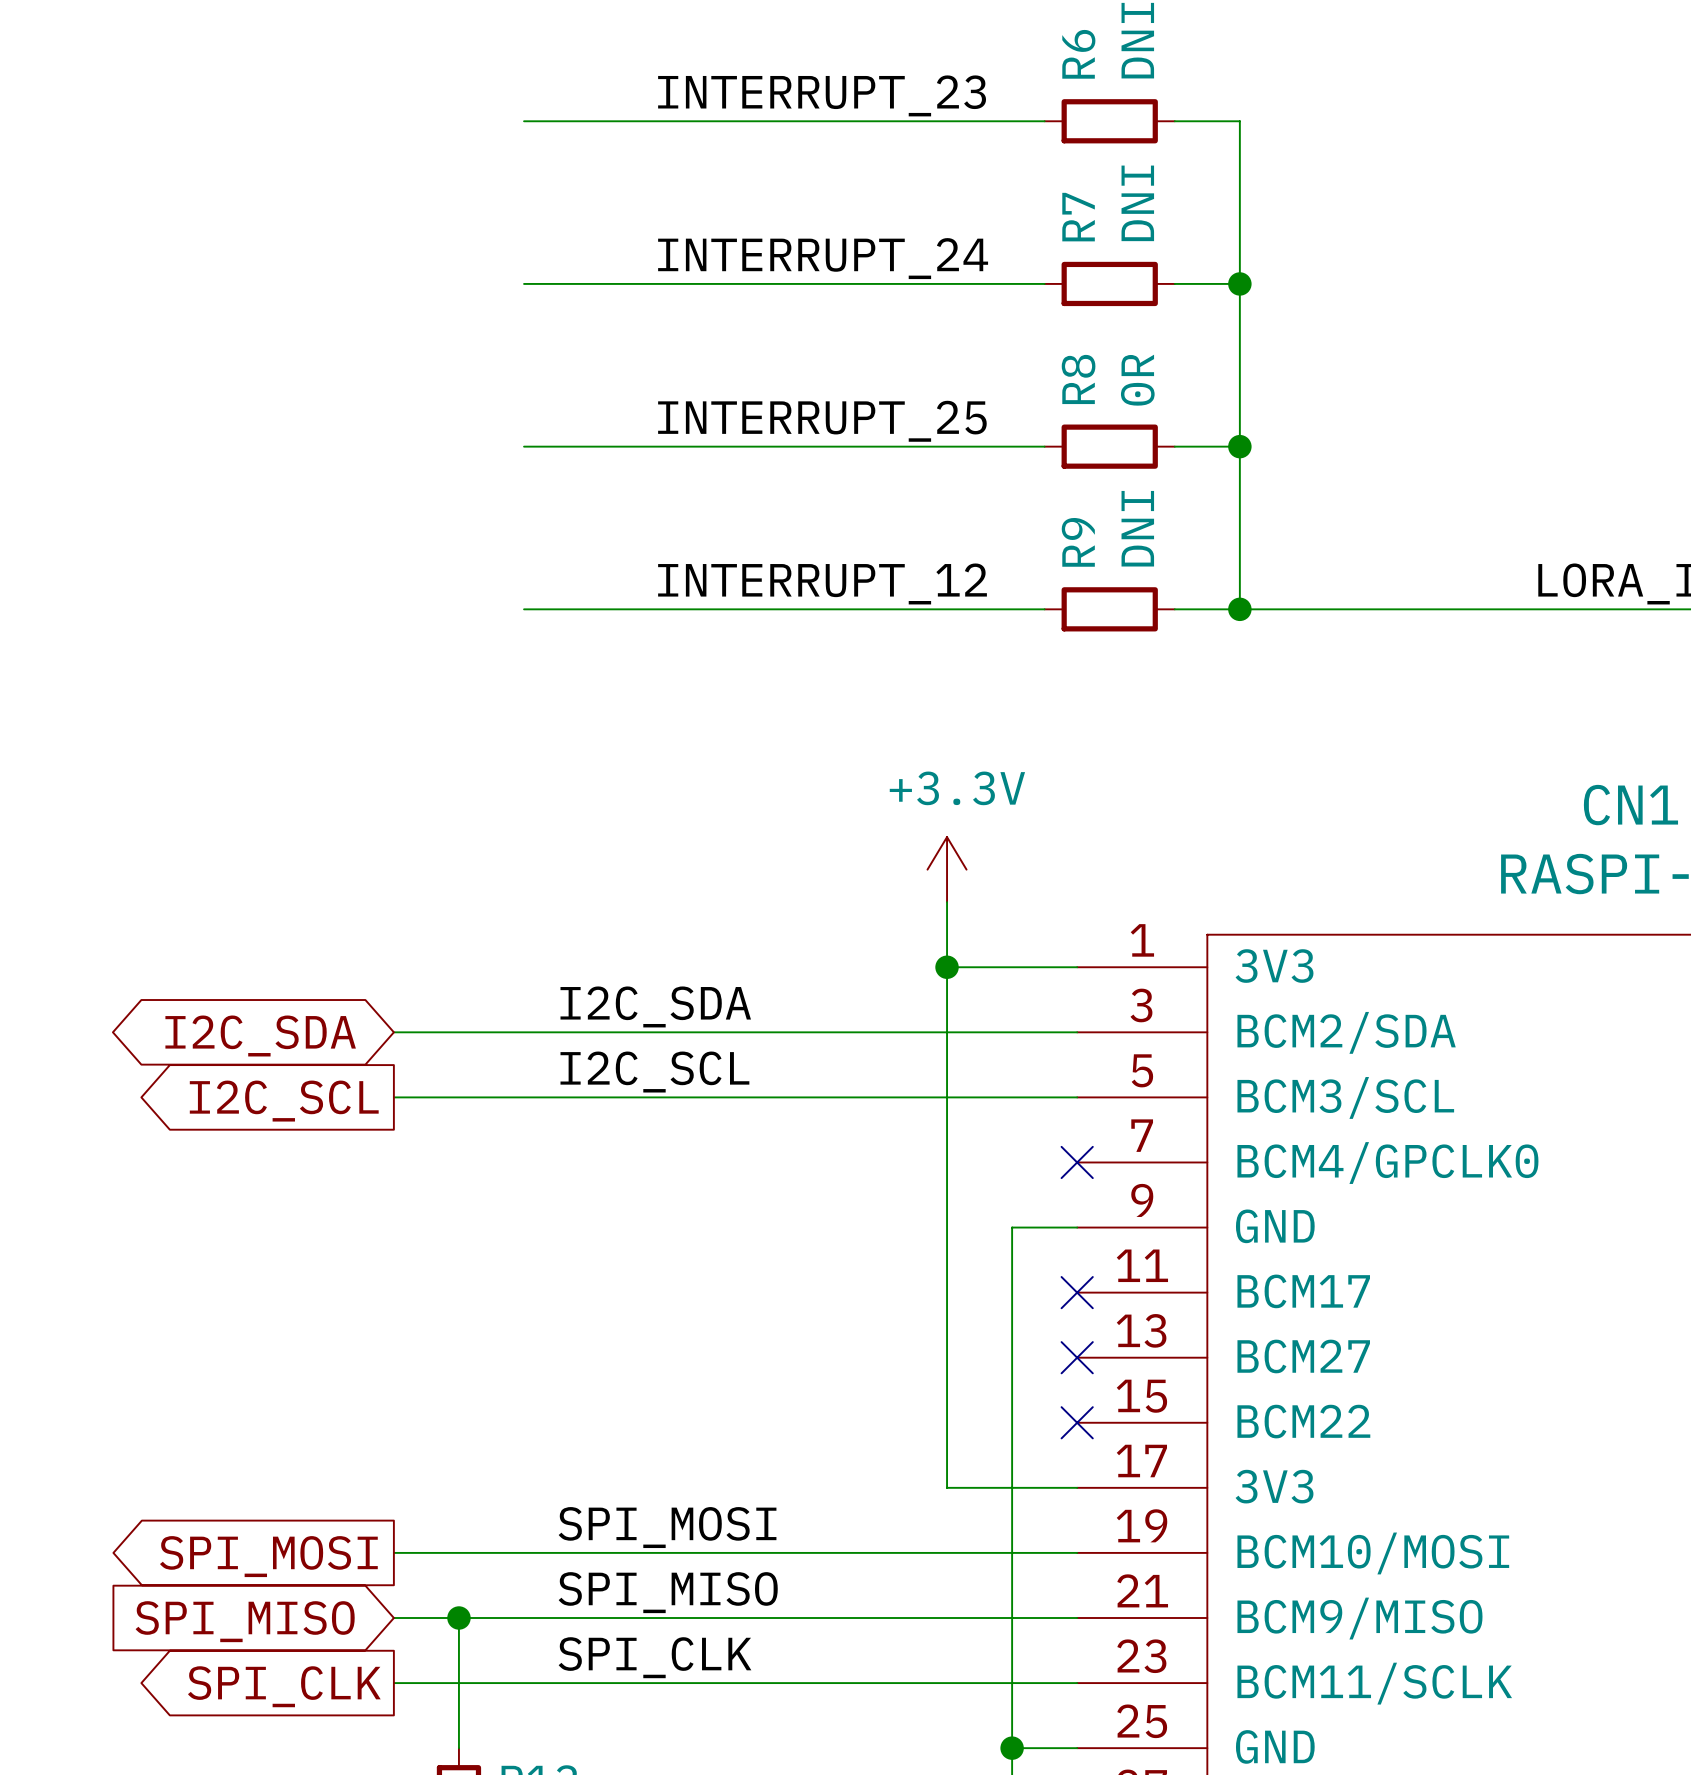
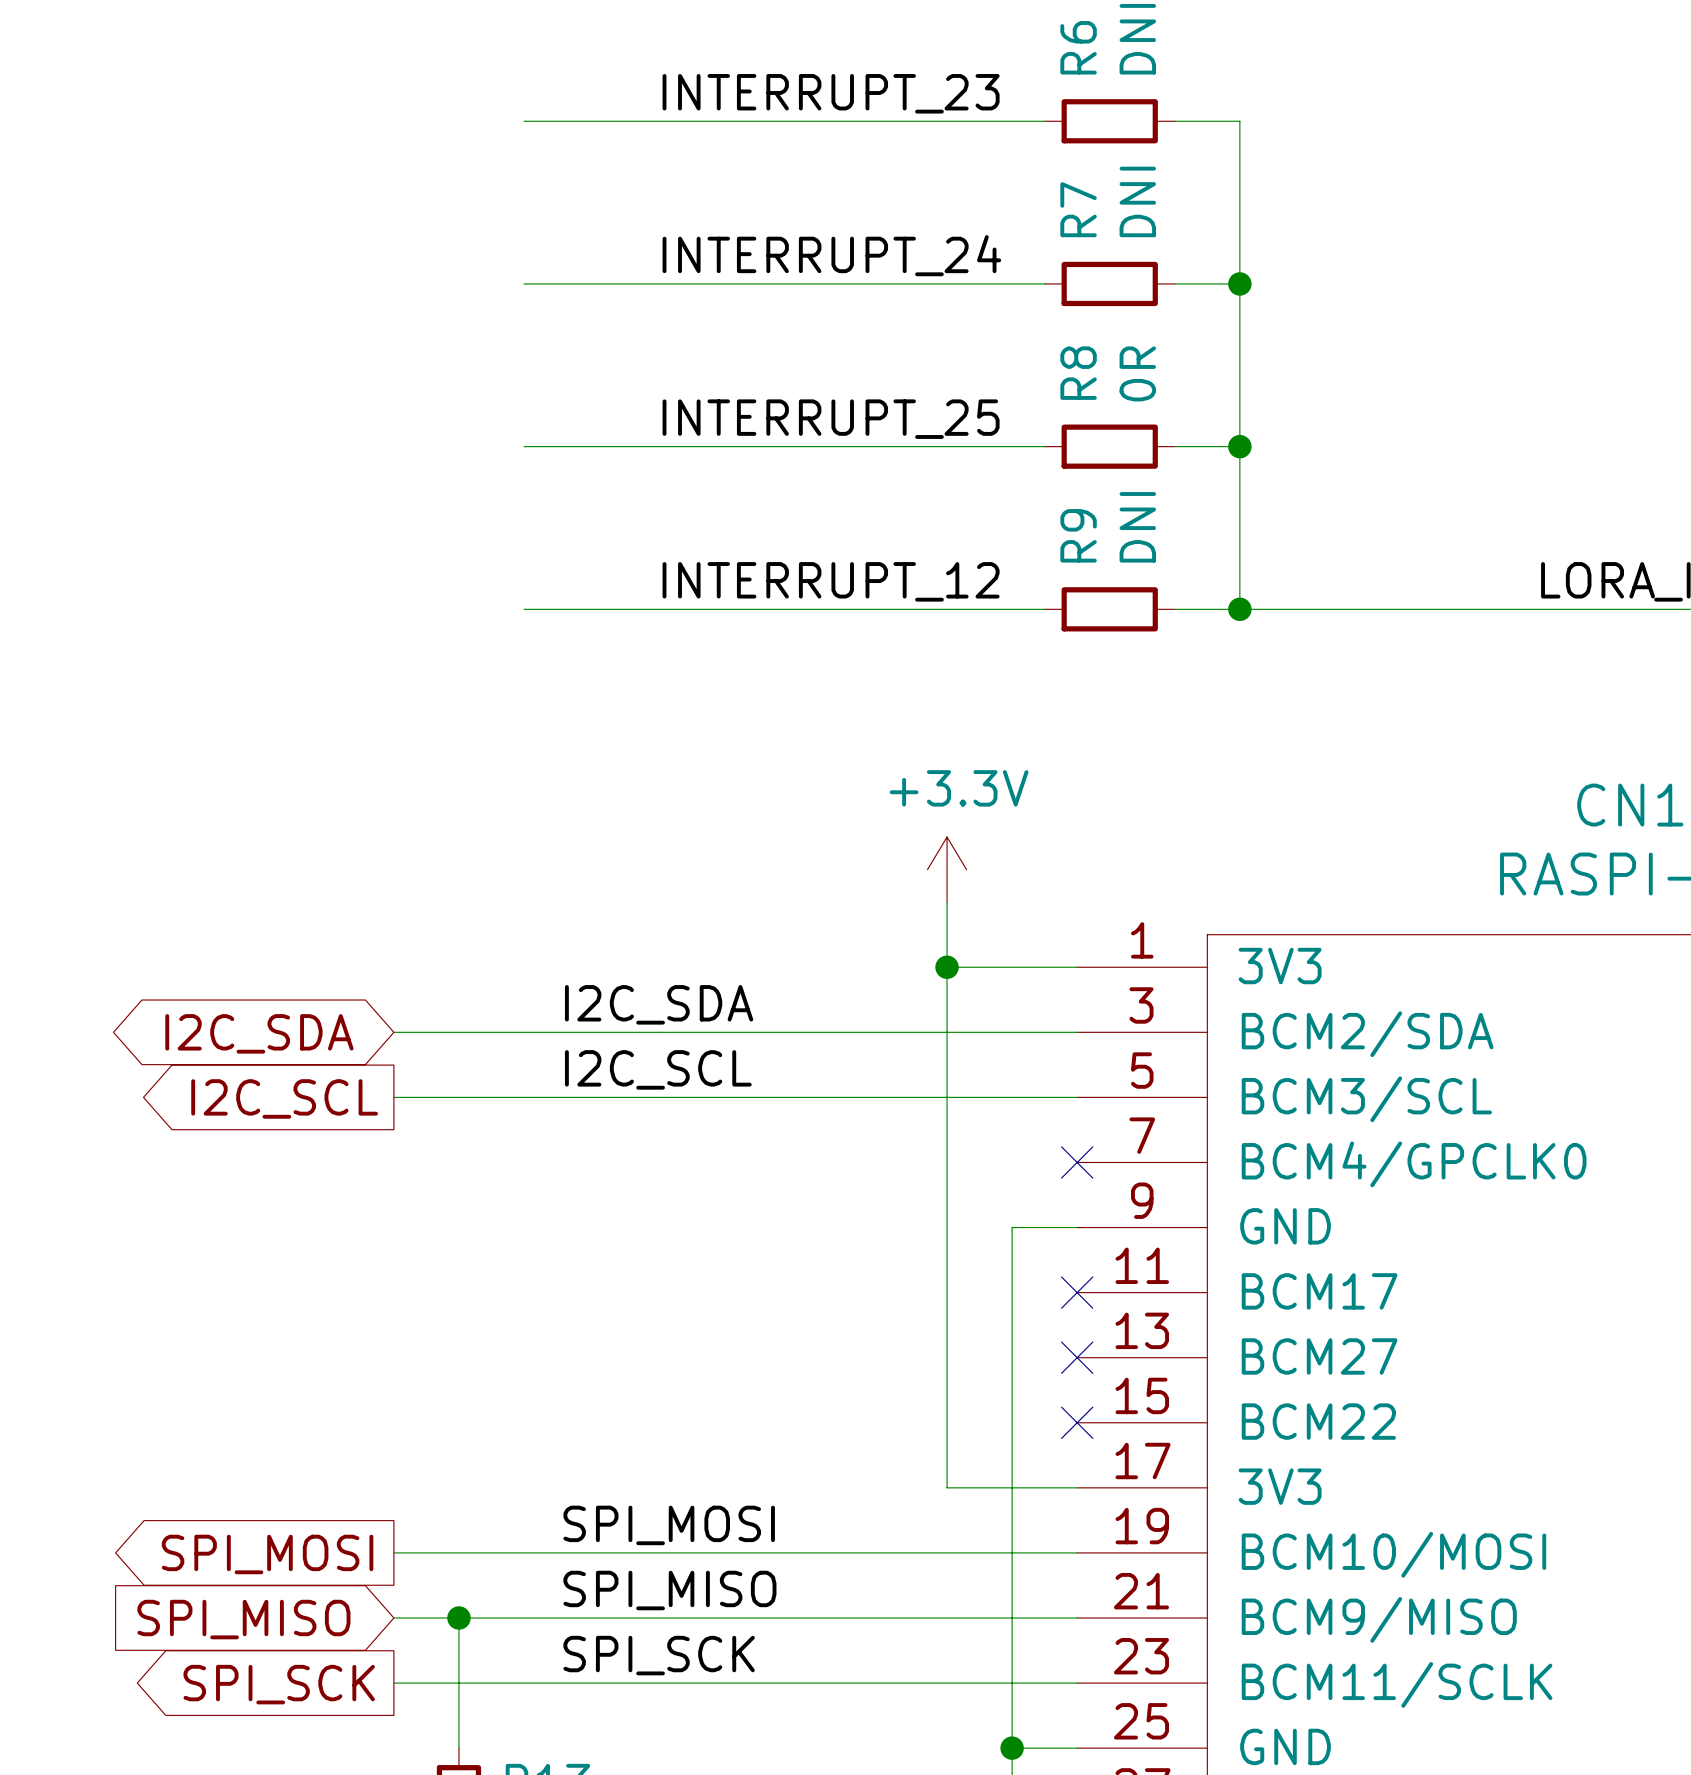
label: SPI_CLK (655, 1657) -> SPI_SCK (659, 1655)
global label: SPI_CLK (284, 1686) -> SPI_SCK (279, 1684)

